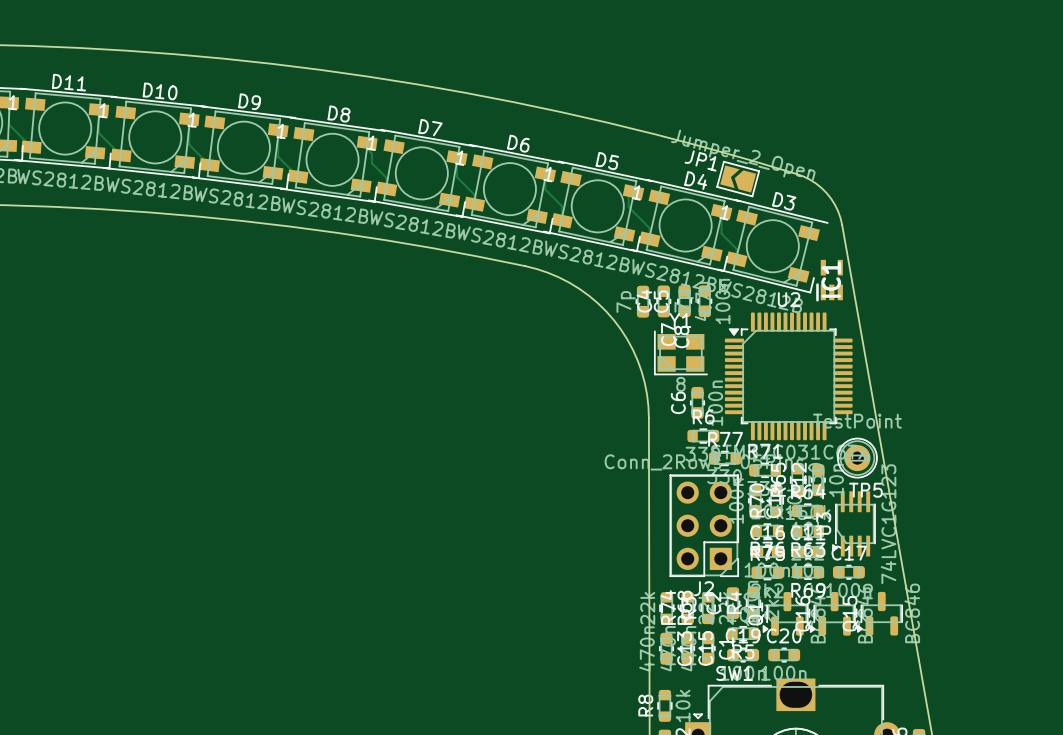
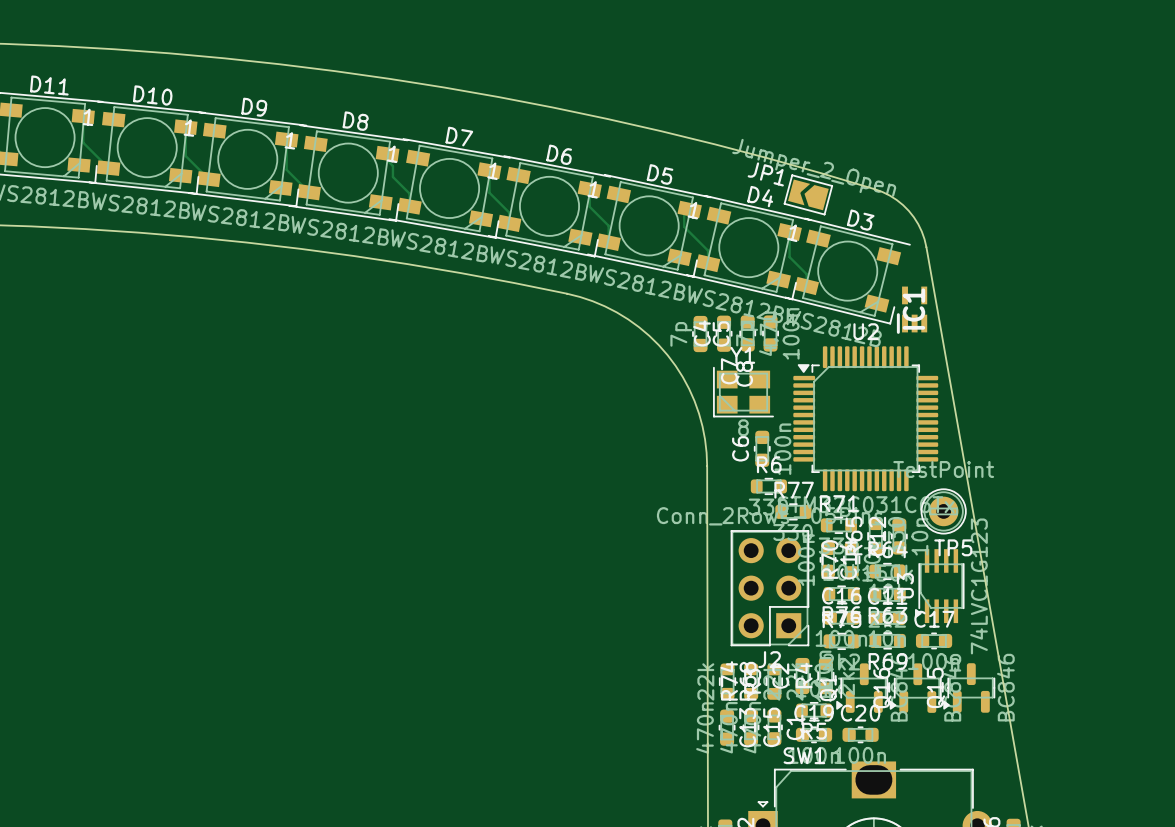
R8: 10k (664, 705) -> none

